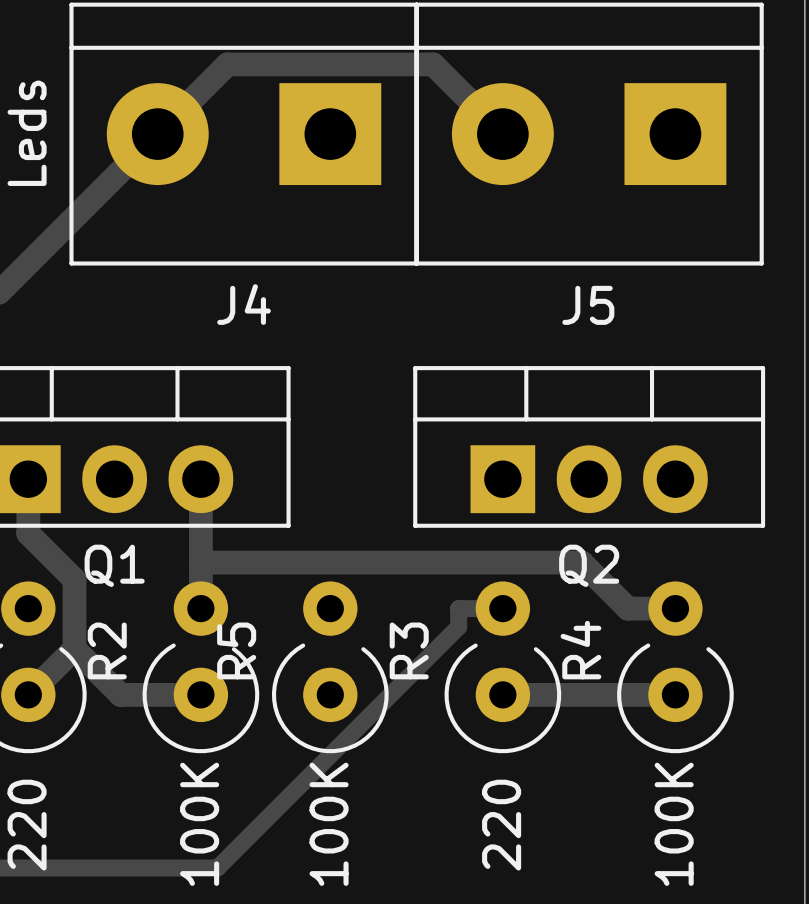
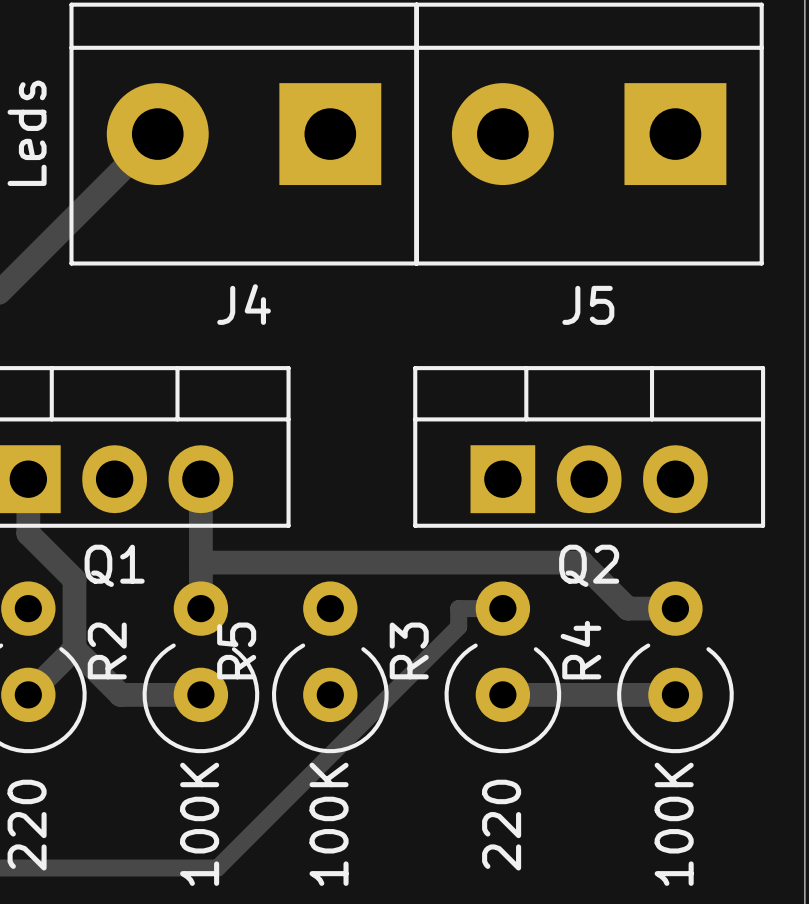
track: (157, 134) (227, 64) (433, 64) (502, 134) -> none

